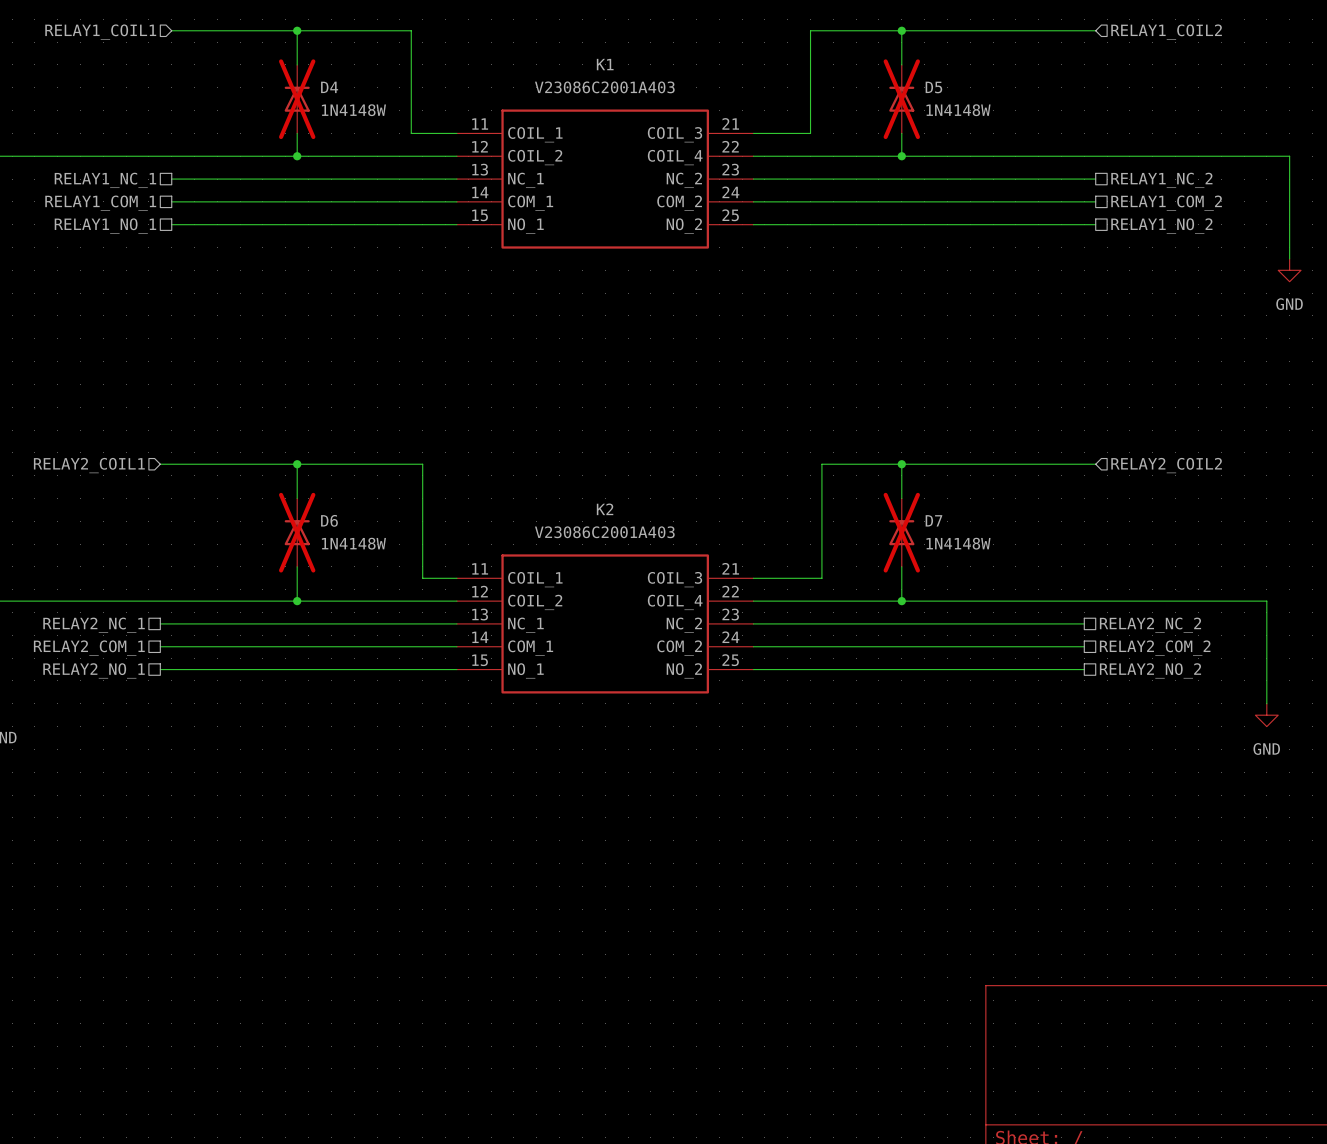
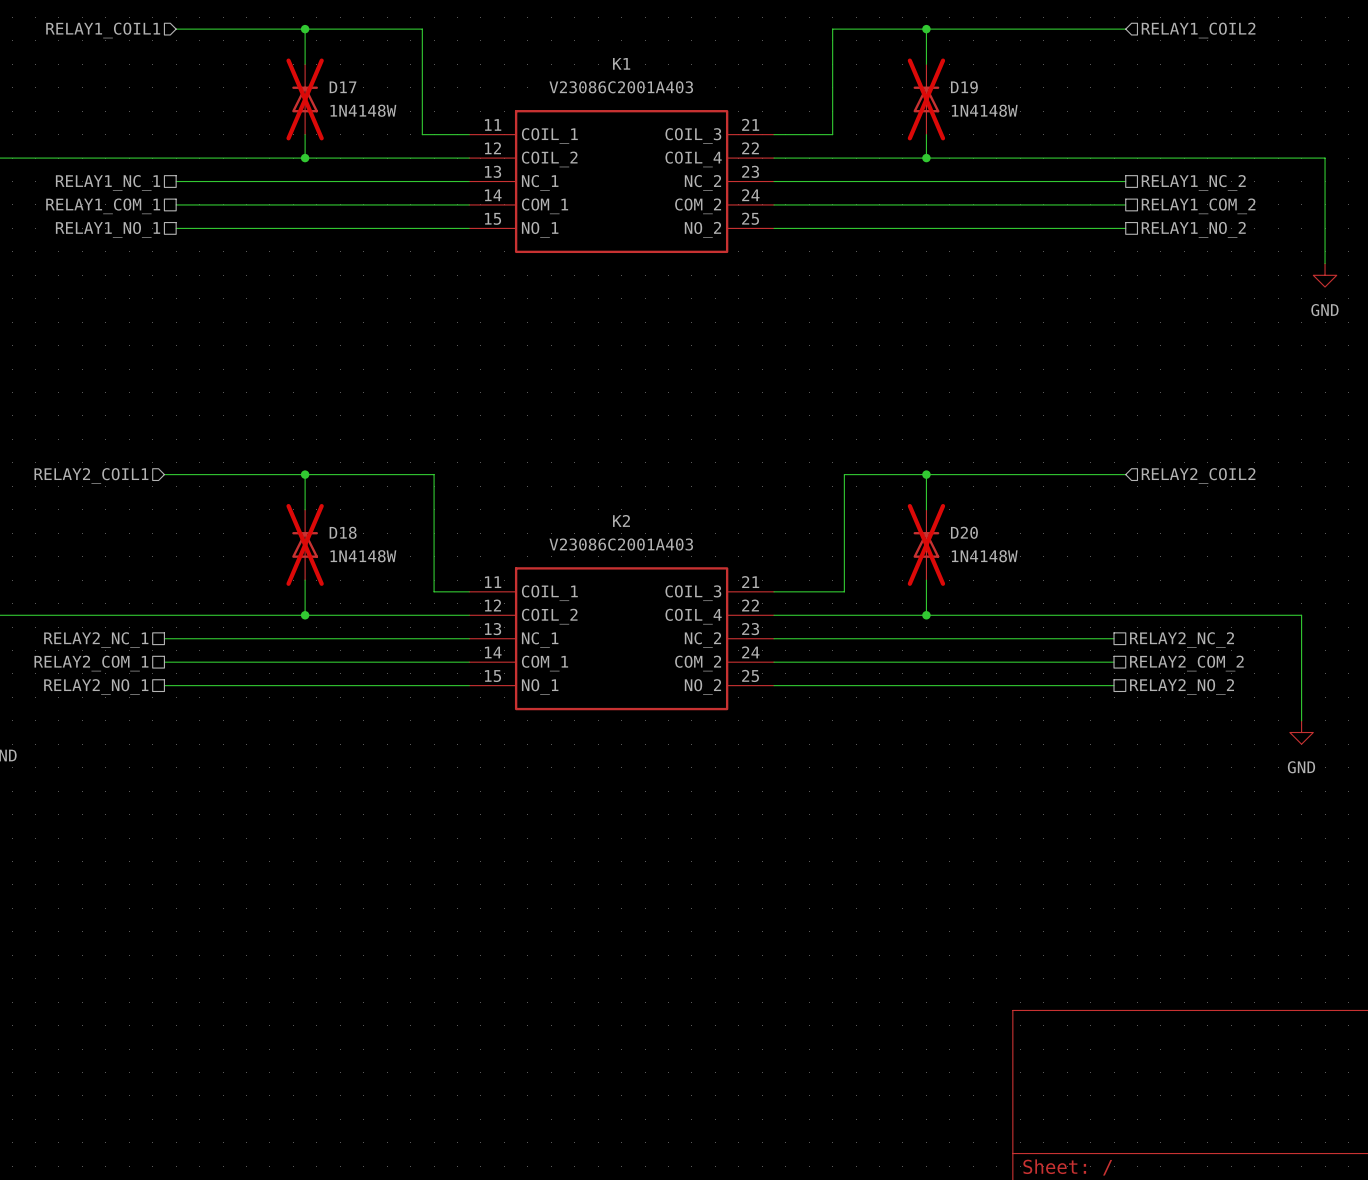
D4 name: D4 (329, 87) -> D17 (343, 87)
D5 name: D5 (933, 87) -> D19 (964, 87)
D6 name: D6 (329, 520) -> D18 (343, 532)
D7 name: D7 (933, 520) -> D20 (964, 532)

